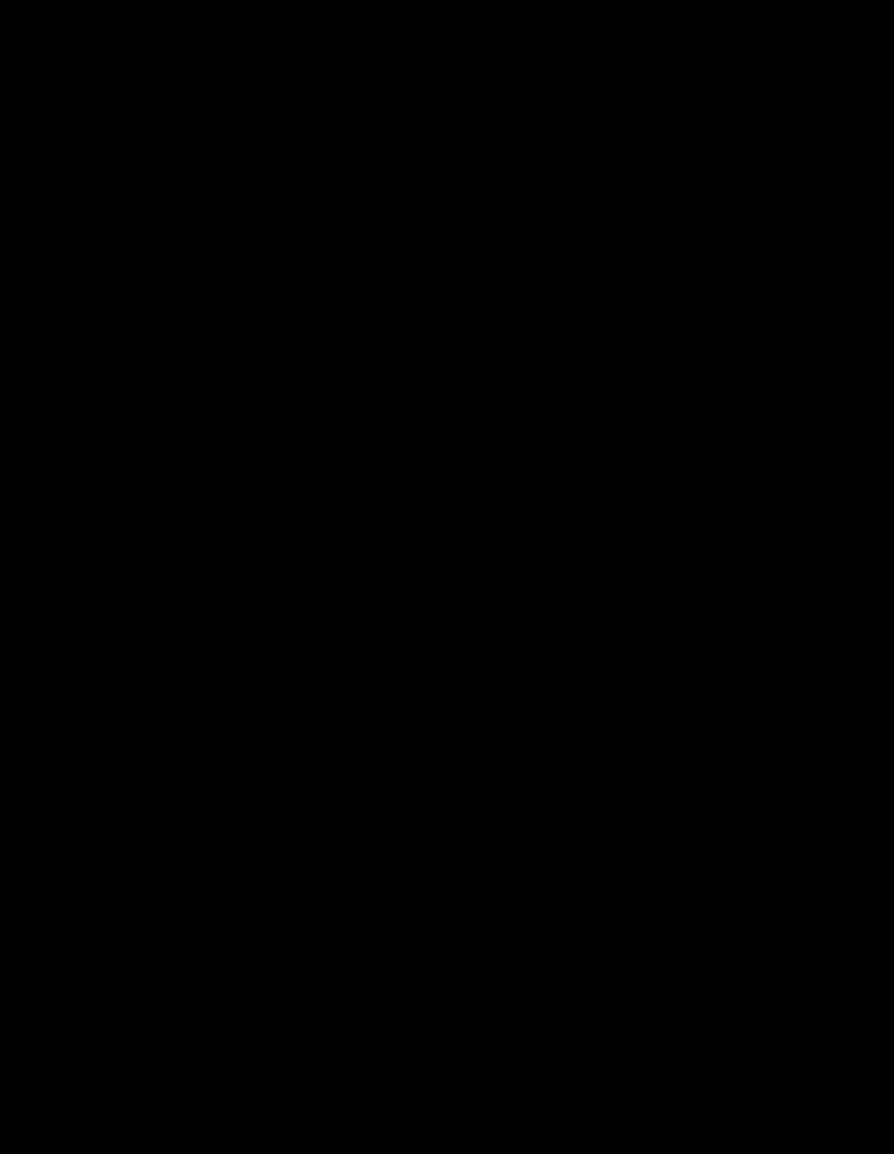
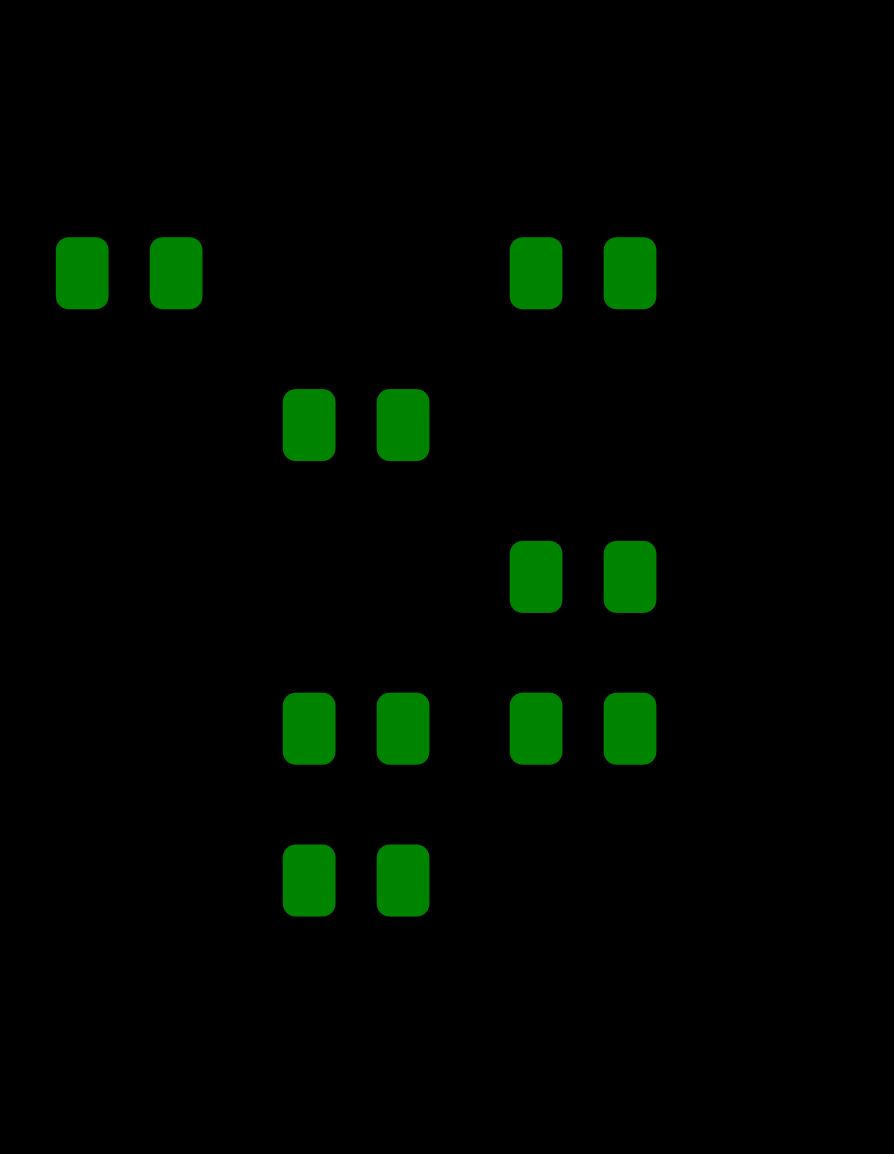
part: none -> (129, 273)
part: none -> (583, 273)
part: none -> (356, 425)
part: none -> (583, 576)
part: none -> (356, 728)
part: none -> (583, 728)
part: none -> (356, 880)

